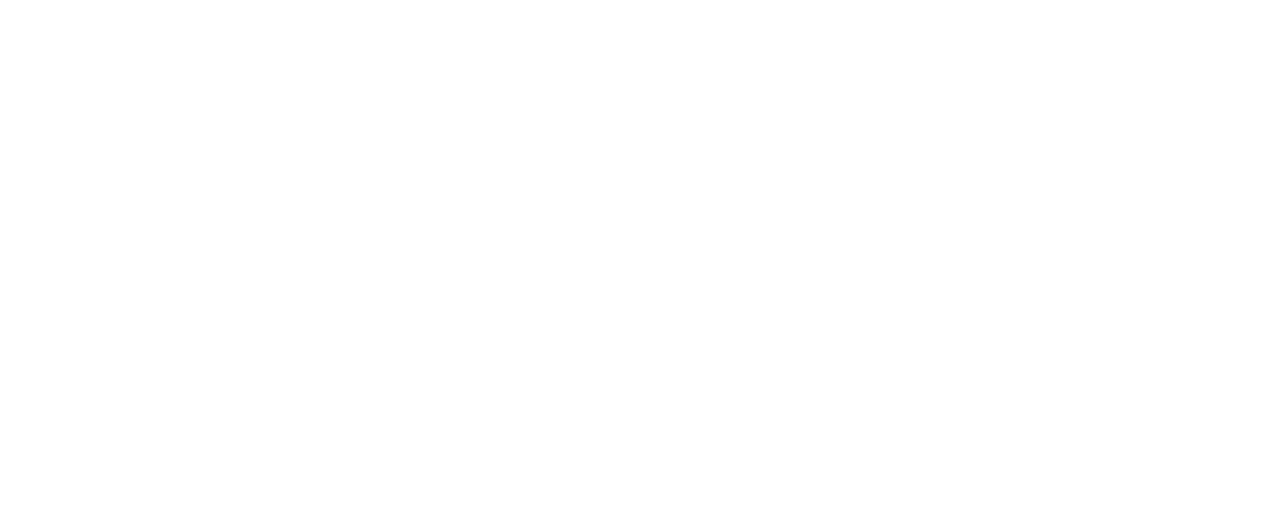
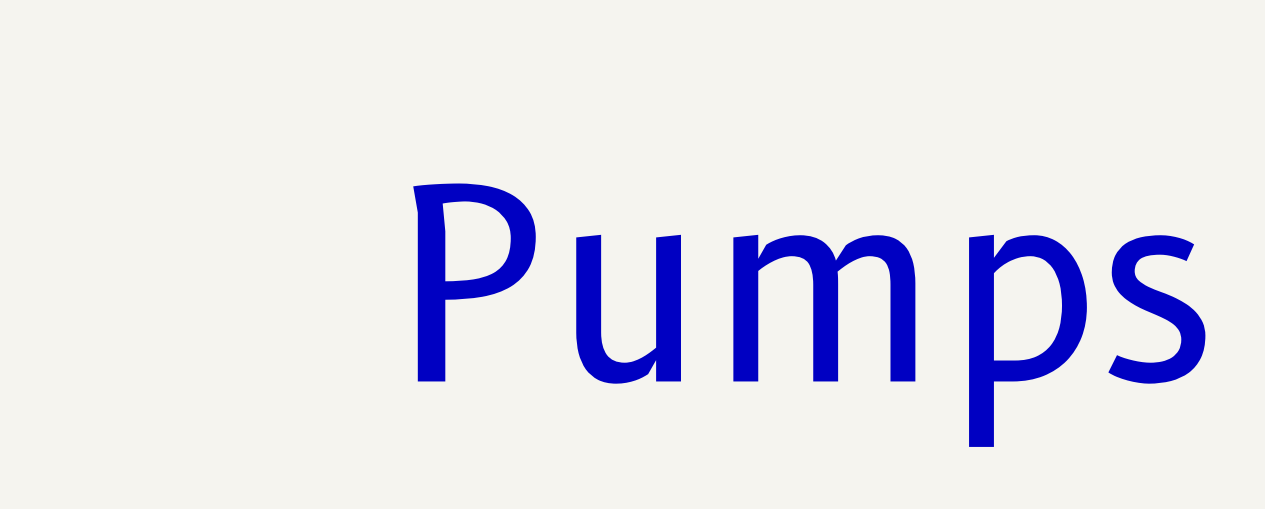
text: none -> Pumps (809, 315)

